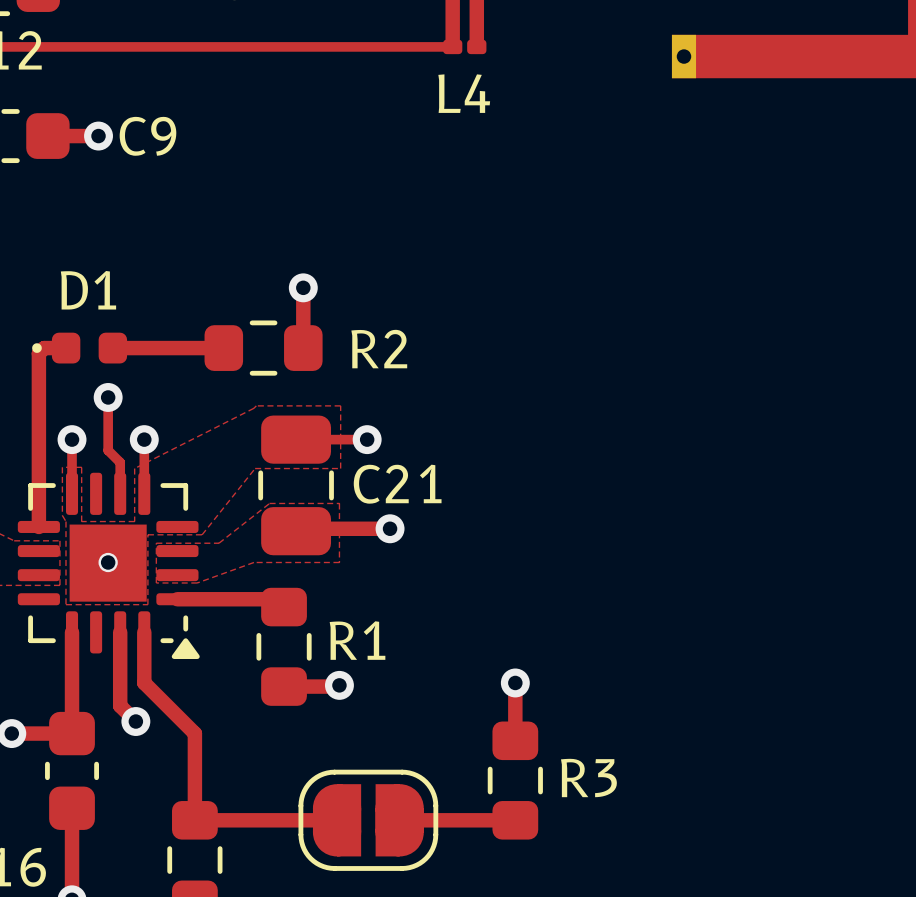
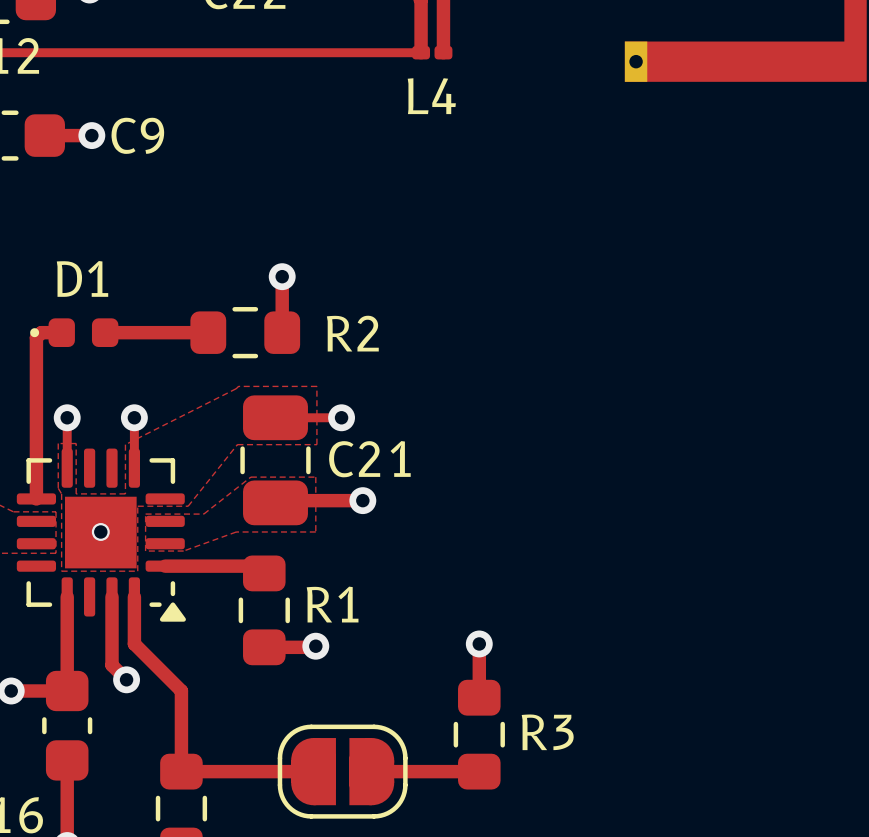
track: (108, 397) (108, 450) (120, 462) (120, 493) -> none
via: (108, 397) -> none

